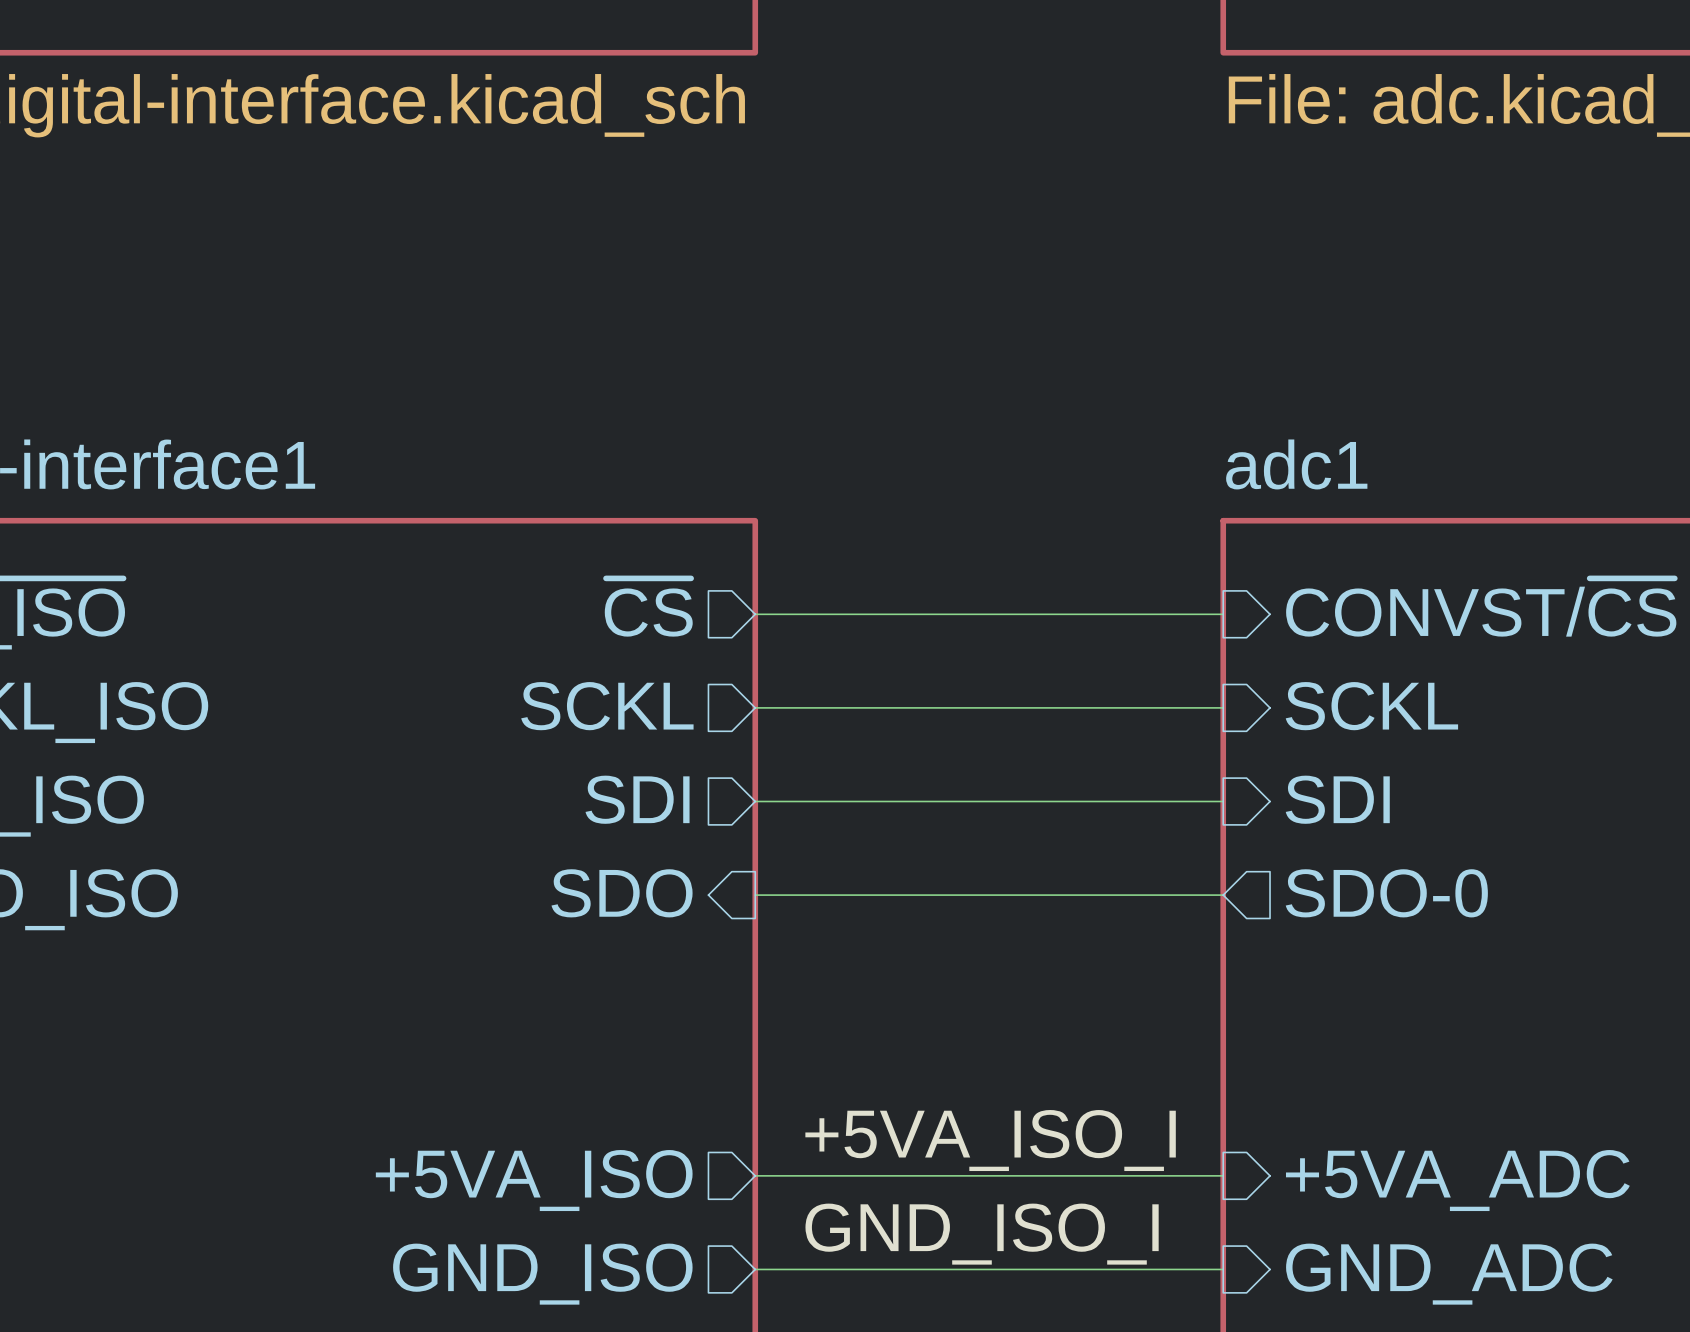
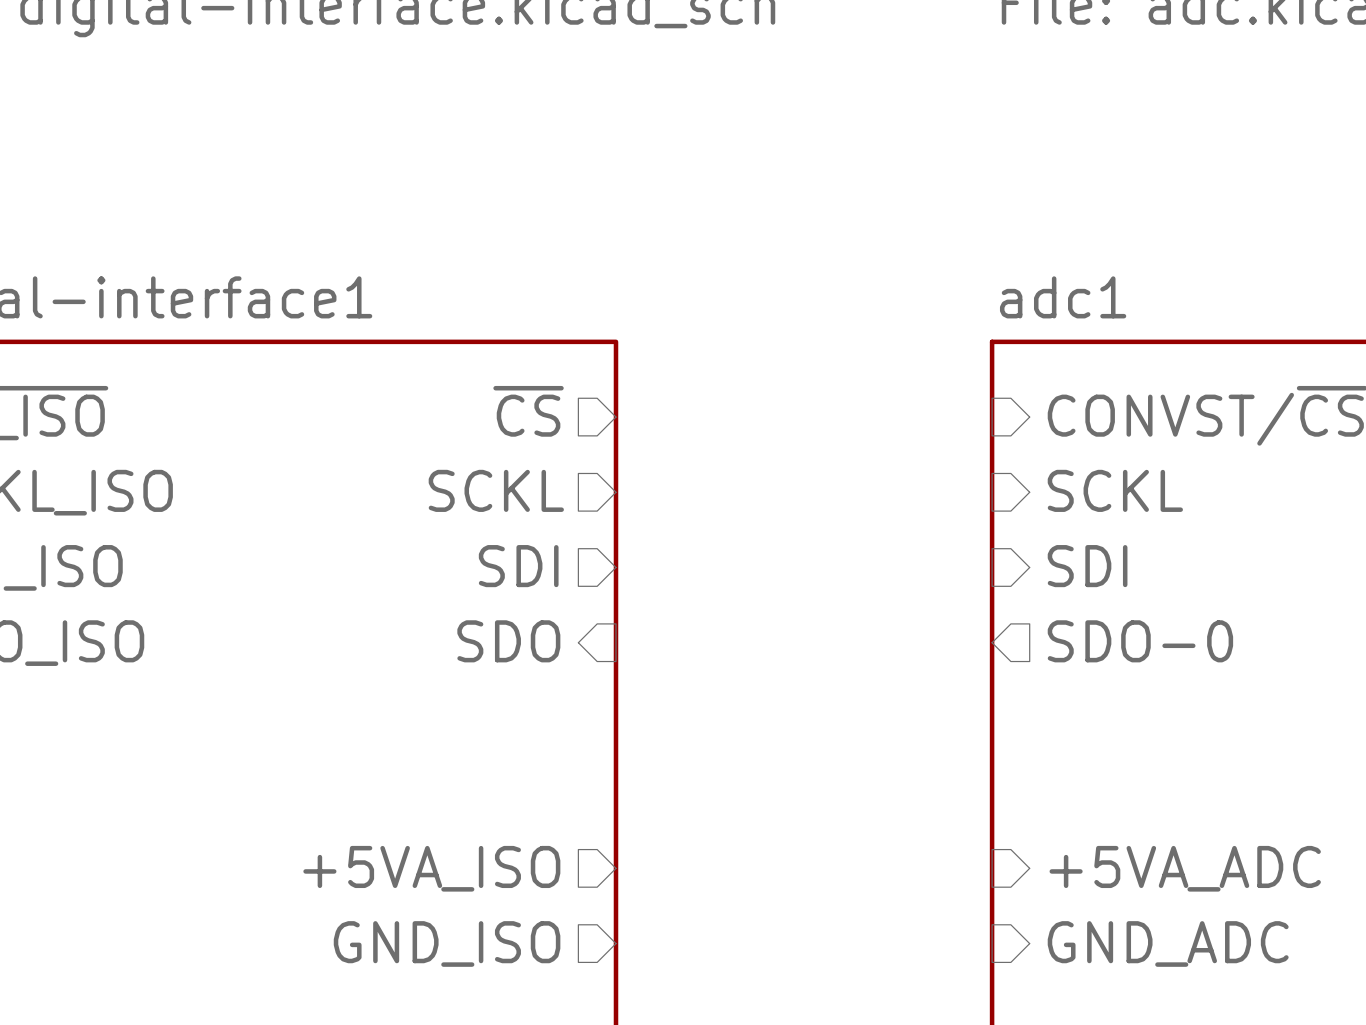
wire: (755, 614) (1223, 614) -> none
wire: (755, 707) (1223, 707) -> none
wire: (755, 801) (1223, 801) -> none
wire: (755, 895) (1223, 895) -> none
label: +5VA_ISO_I (990, 1140) -> none
wire: (755, 1175) (1223, 1175) -> none
label: GND_ISO_I (982, 1234) -> none
wire: (755, 1269) (1223, 1269) -> none

